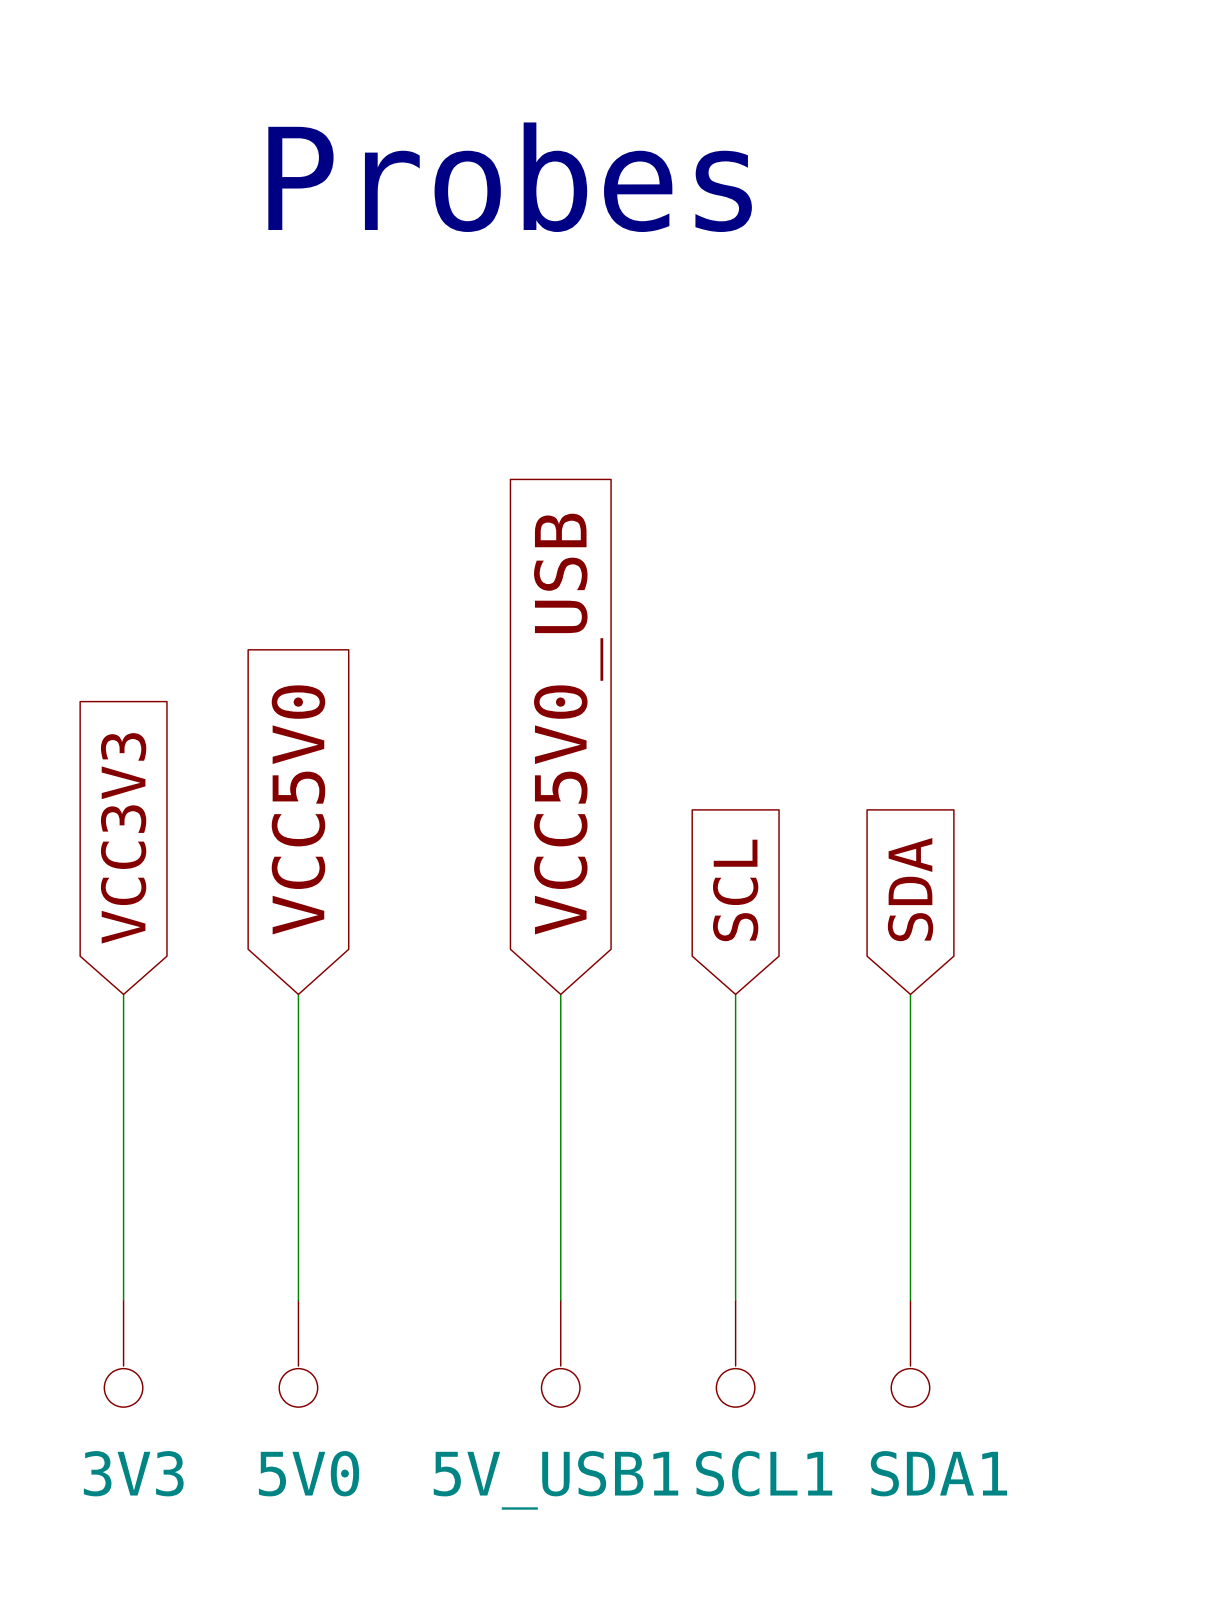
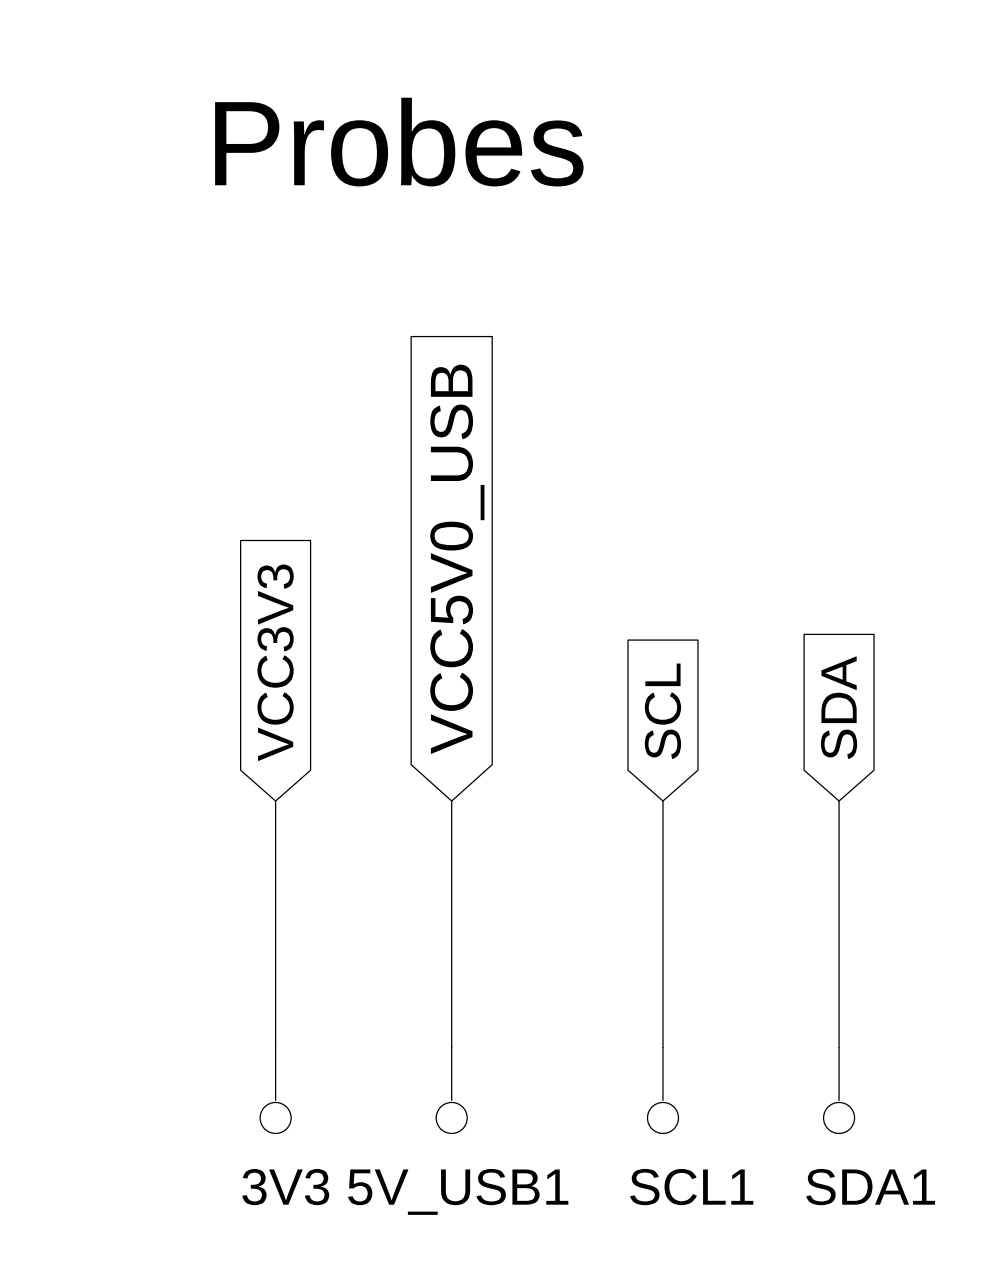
global label: VCC5V0 (298, 809) -> none
global label position: VCC3V3 (123, 838) -> VCC3V3 (275, 662)
global label position: SDA (910, 889) -> SDA (839, 707)
global label position: SCL (735, 890) -> SCL (662, 711)
wire: (123, 994) (123, 1300) -> none
wire: (298, 994) (298, 1300) -> (275, 801) (275, 1047)
wire: (735, 994) (735, 1300) -> (662, 801) (662, 1047)
wire: (910, 994) (910, 1300) -> (839, 801) (839, 1047)
3V3 position: (123, 1353) -> (275, 1090)
5V0: (298, 1353) -> none
SCL1 position: (735, 1353) -> (662, 1090)
SDA1 position: (910, 1353) -> (839, 1090)

